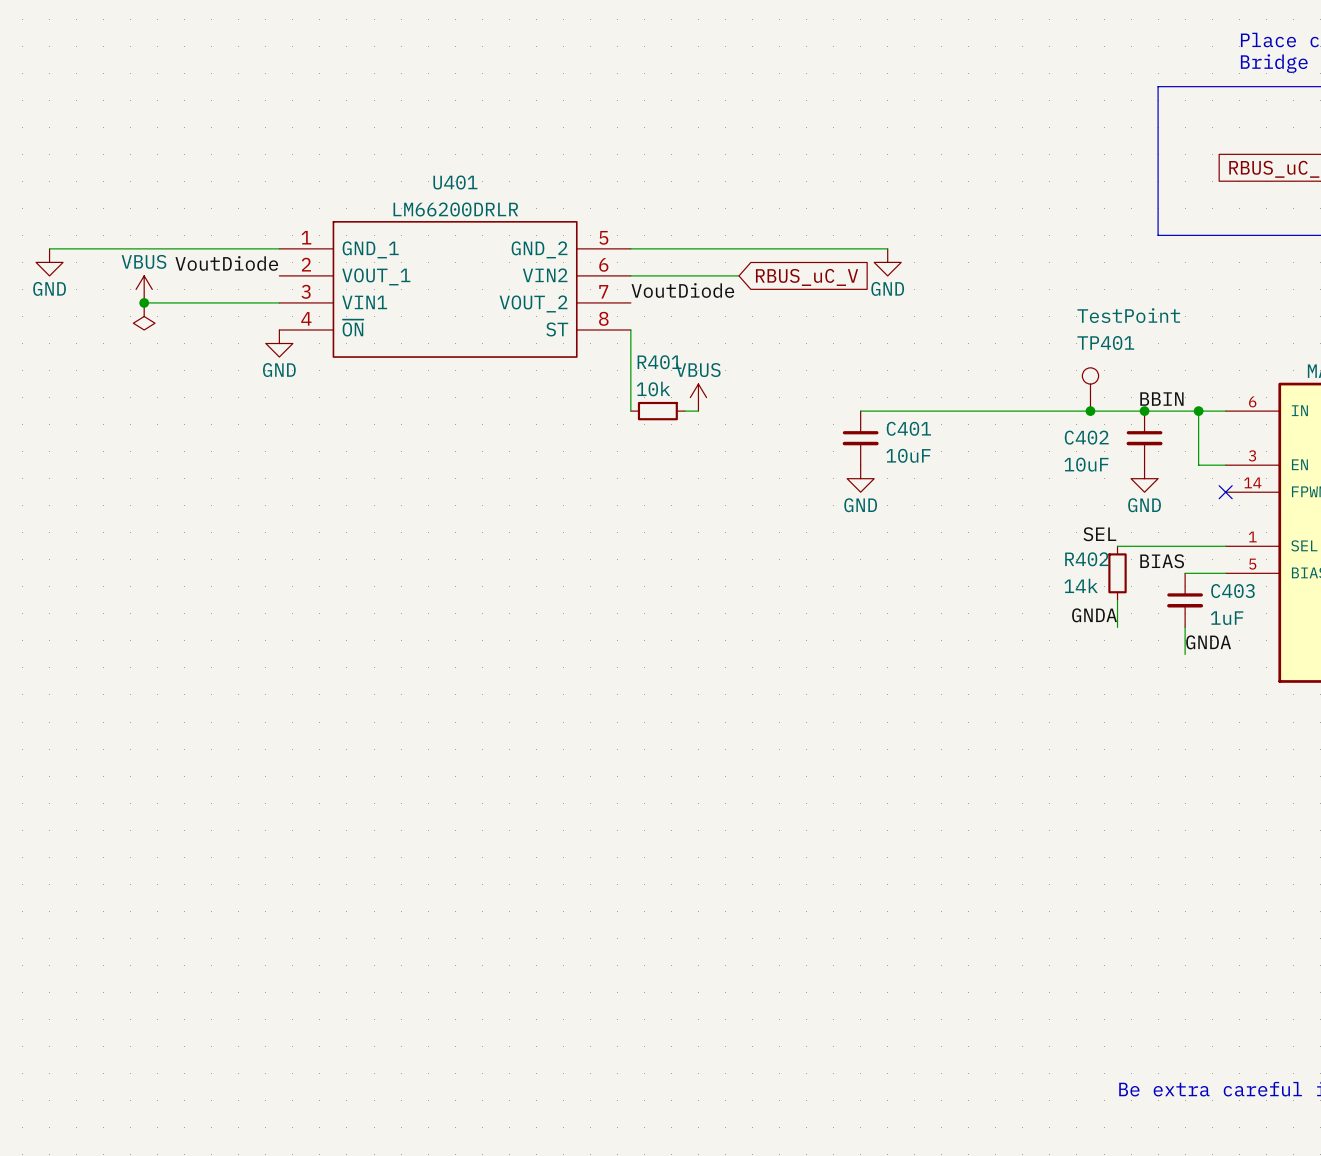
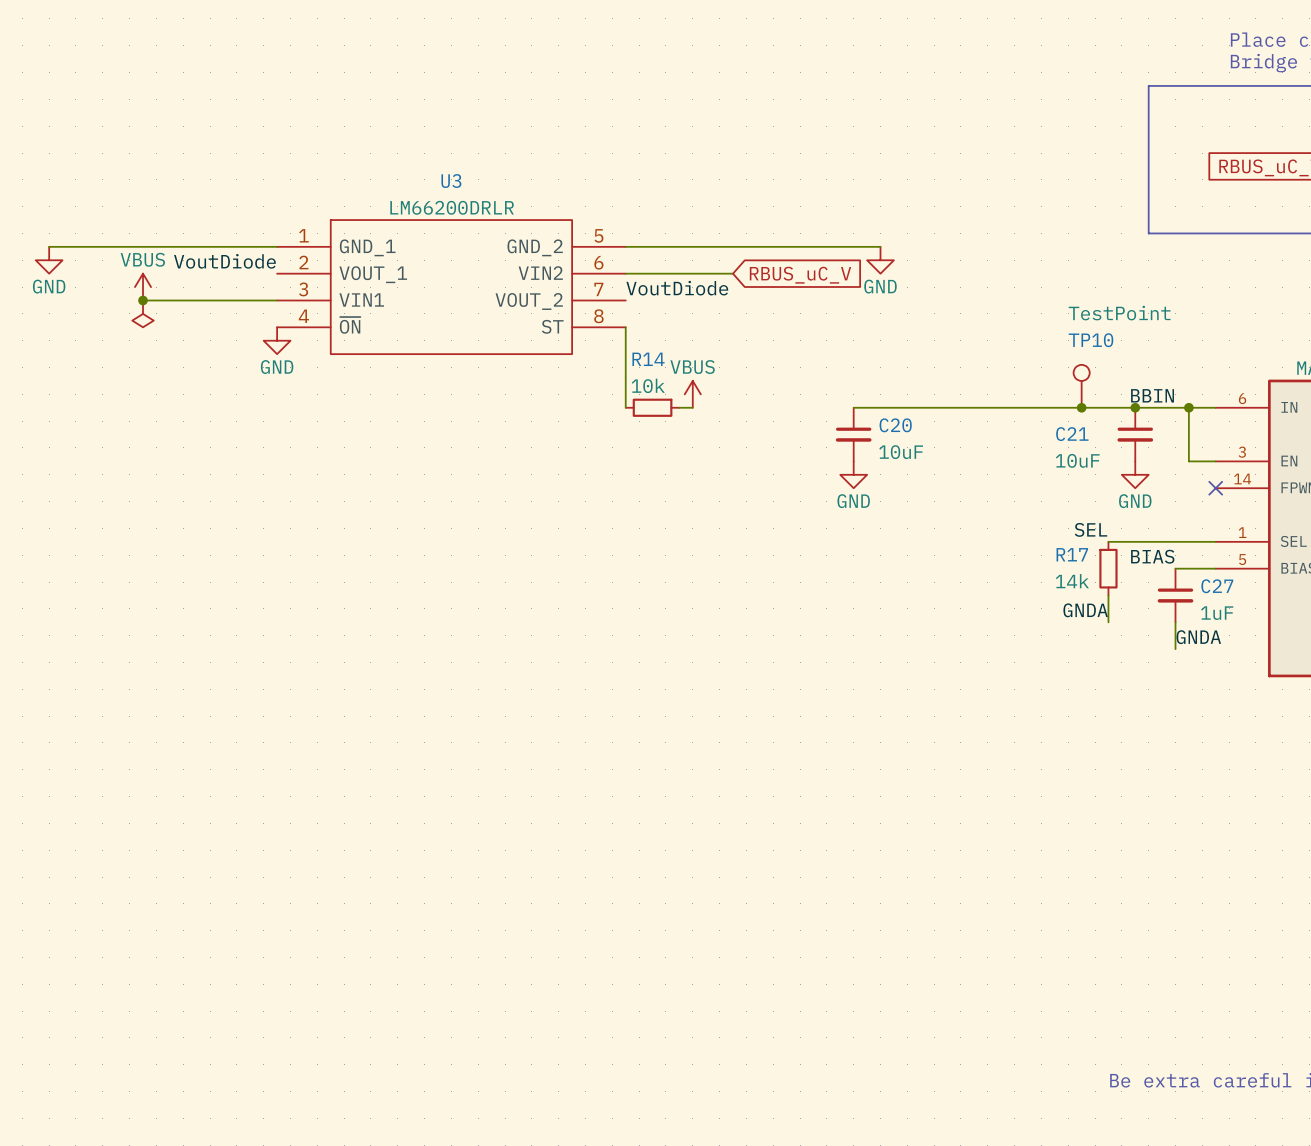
U401 name: U401 (455, 182) -> U3 (451, 181)
TP401 name: TP401 (1105, 343) -> TP10 (1090, 340)
R401 name: R401 (659, 362) -> R14 (648, 359)
C401 name: C401 (908, 428) -> C20 (895, 425)
C402 name: C402 (1086, 437) -> C21 (1072, 434)
R402 name: R402 (1086, 559) -> R17 (1072, 554)
C403 name: C403 (1232, 591) -> C27 (1217, 586)

